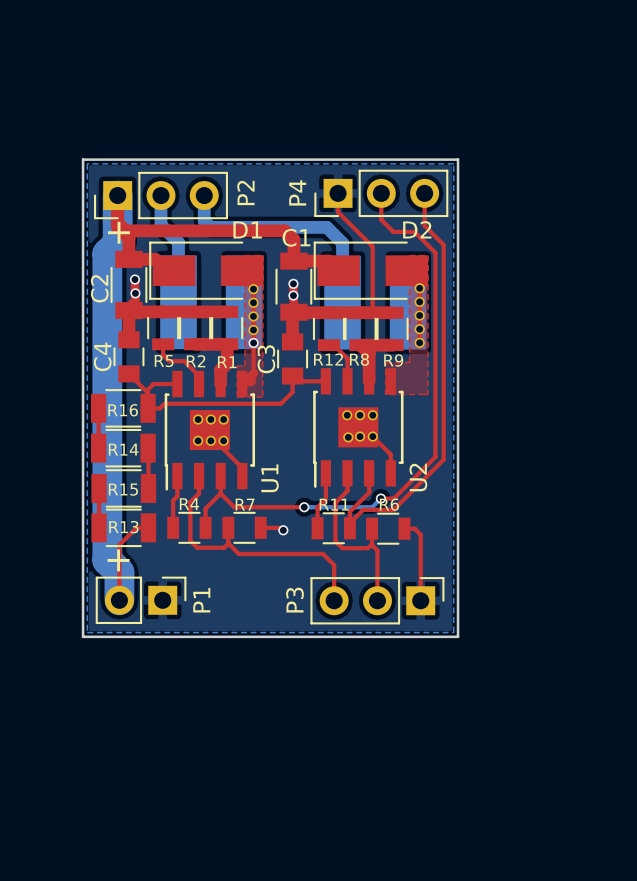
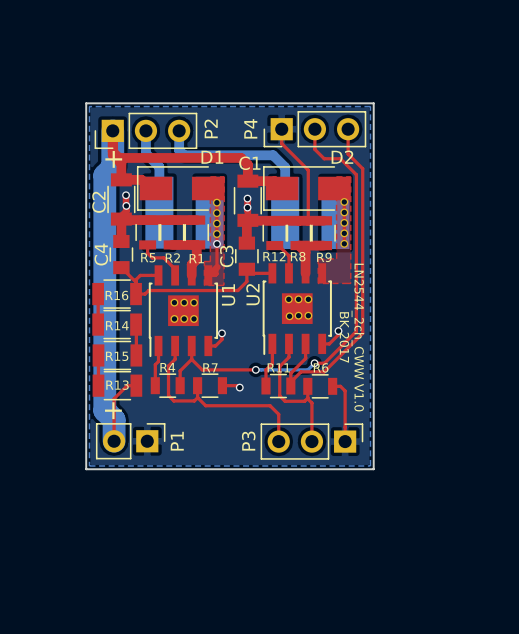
top track: (372, 436) (390, 454) (390, 473) -> (338, 331) (338, 334) (329, 343) (322, 343)
top track: (223, 440) (223, 449) (242, 467) (242, 476) -> (221, 333) (221, 339) (215, 345) (208, 345)
via: none -> (338, 331)
via: none -> (221, 333)
text: none -> BK 2017 (344, 337)
text: none -> LN2544_2ch_CWW V1.0 (357, 337)
U2 name position: U2 (418, 477) -> U2 (253, 294)
U1 name position: U1 (270, 478) -> U1 (228, 294)

